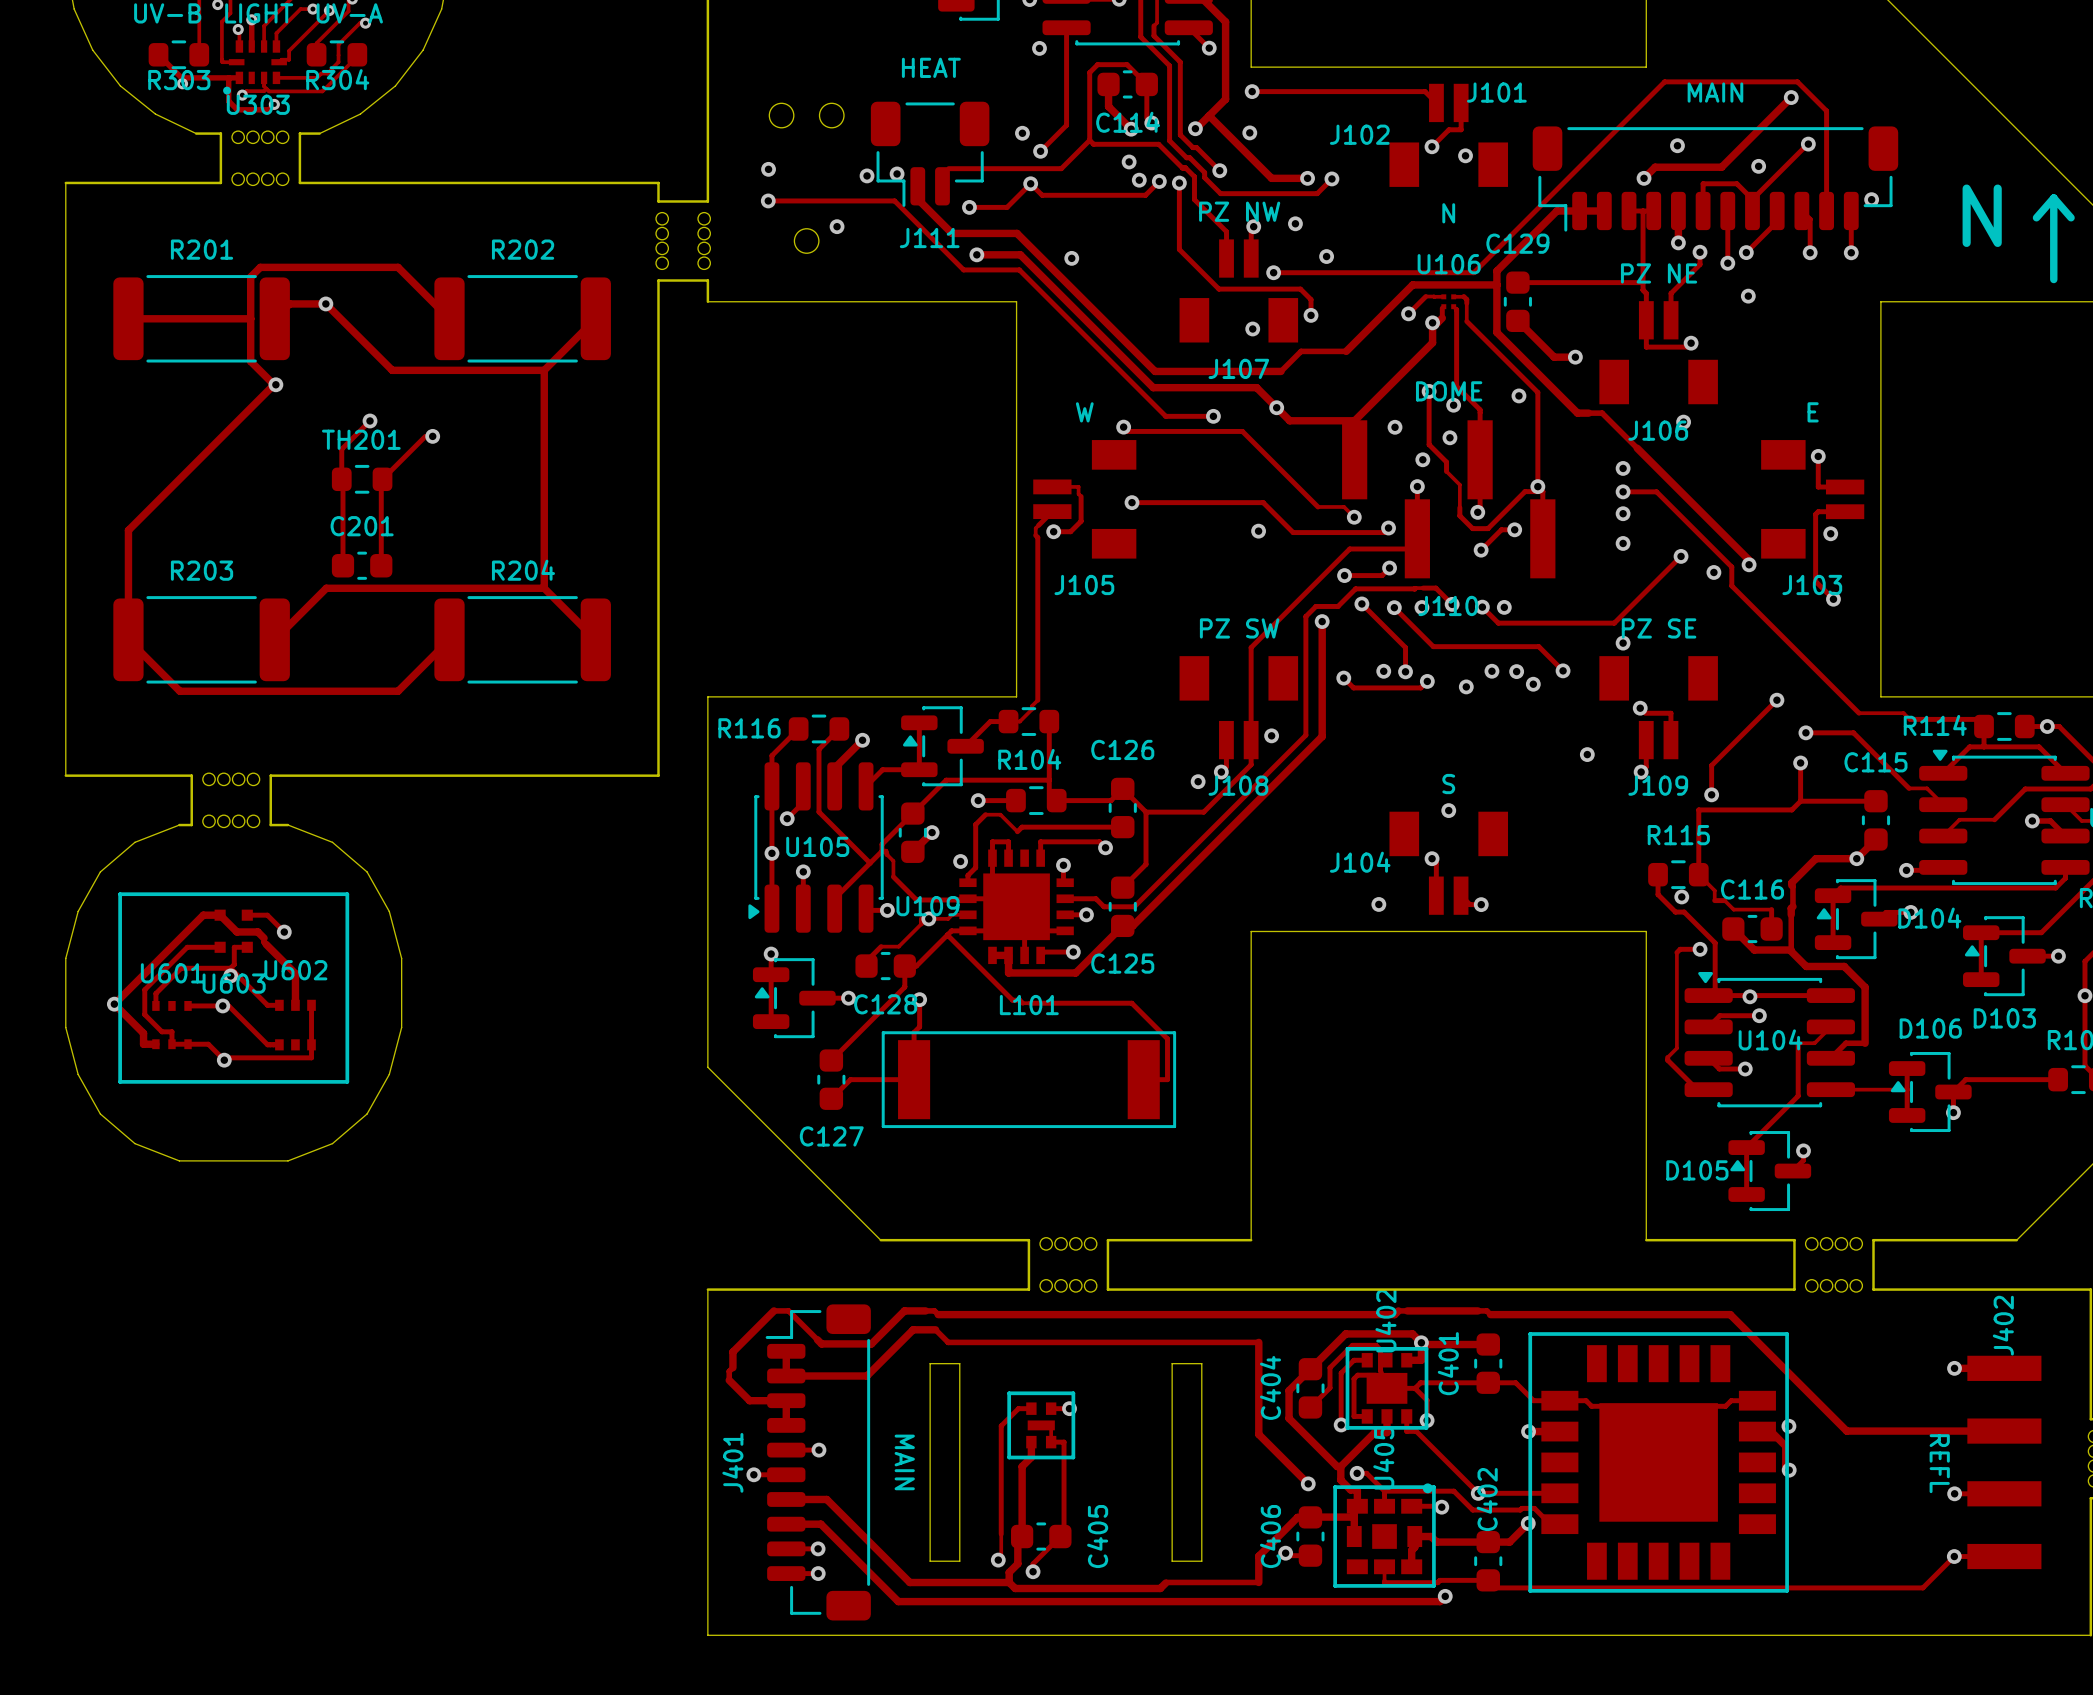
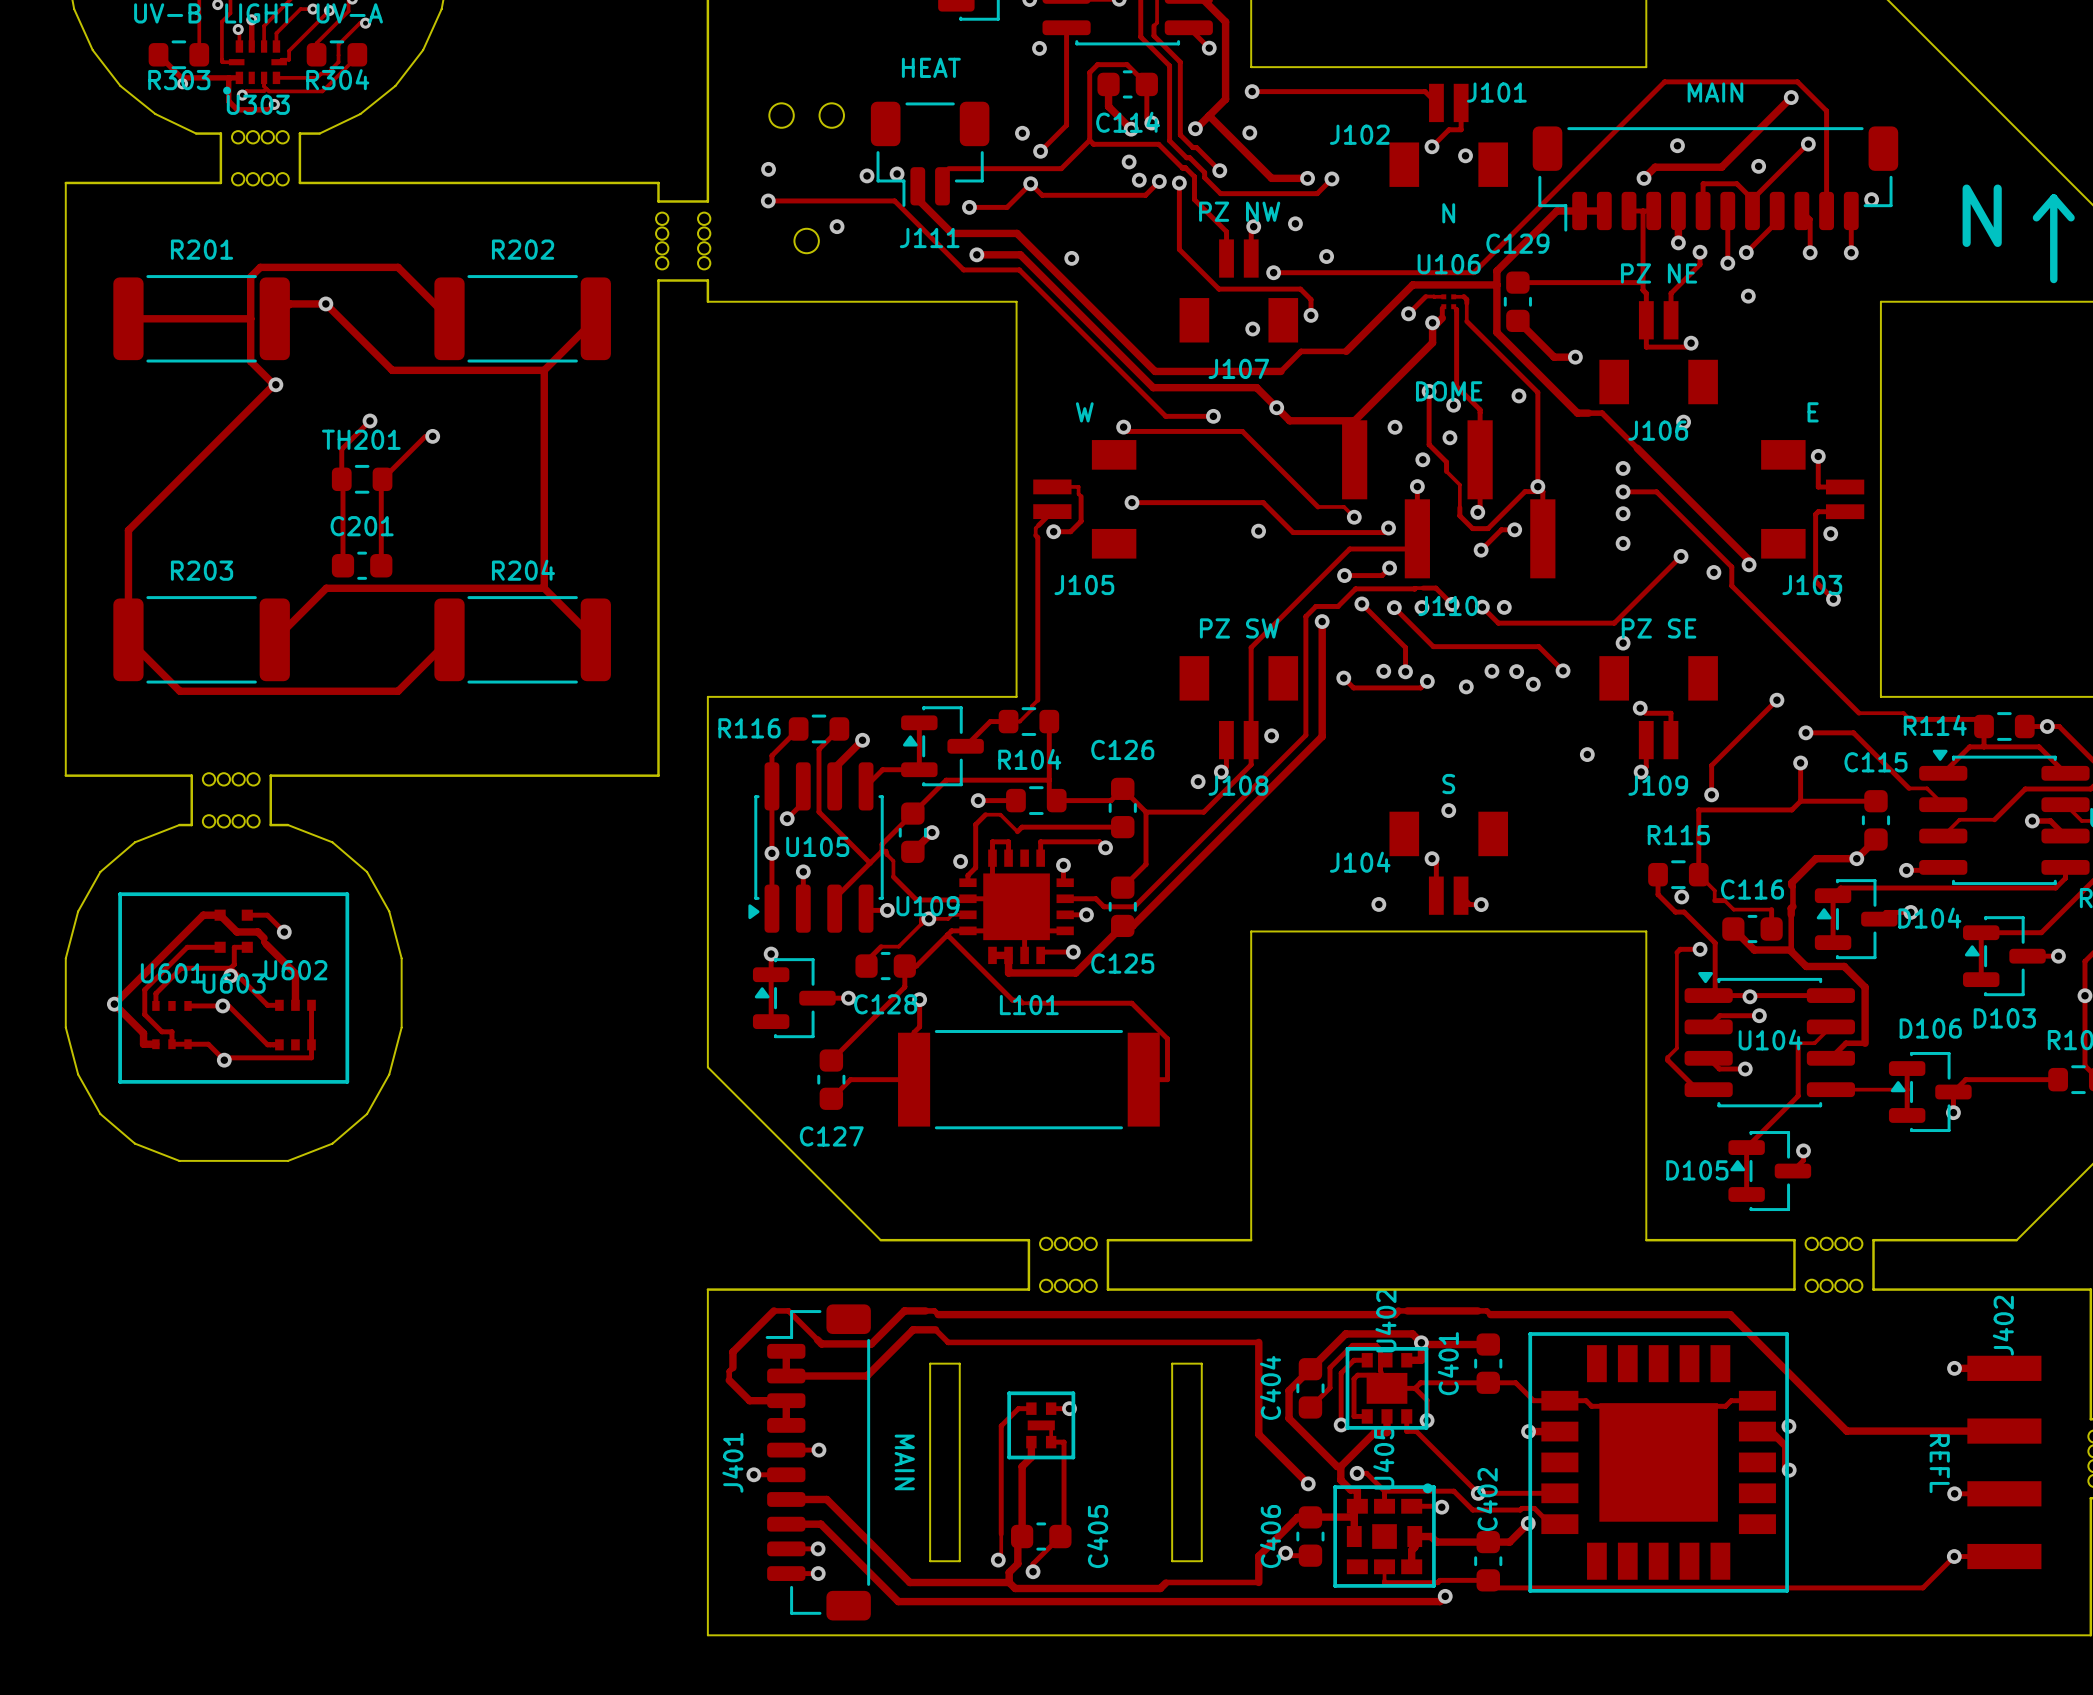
L101 footprint: [881, 1031, 1177, 1129] -> [898, 1030, 1160, 1130]

